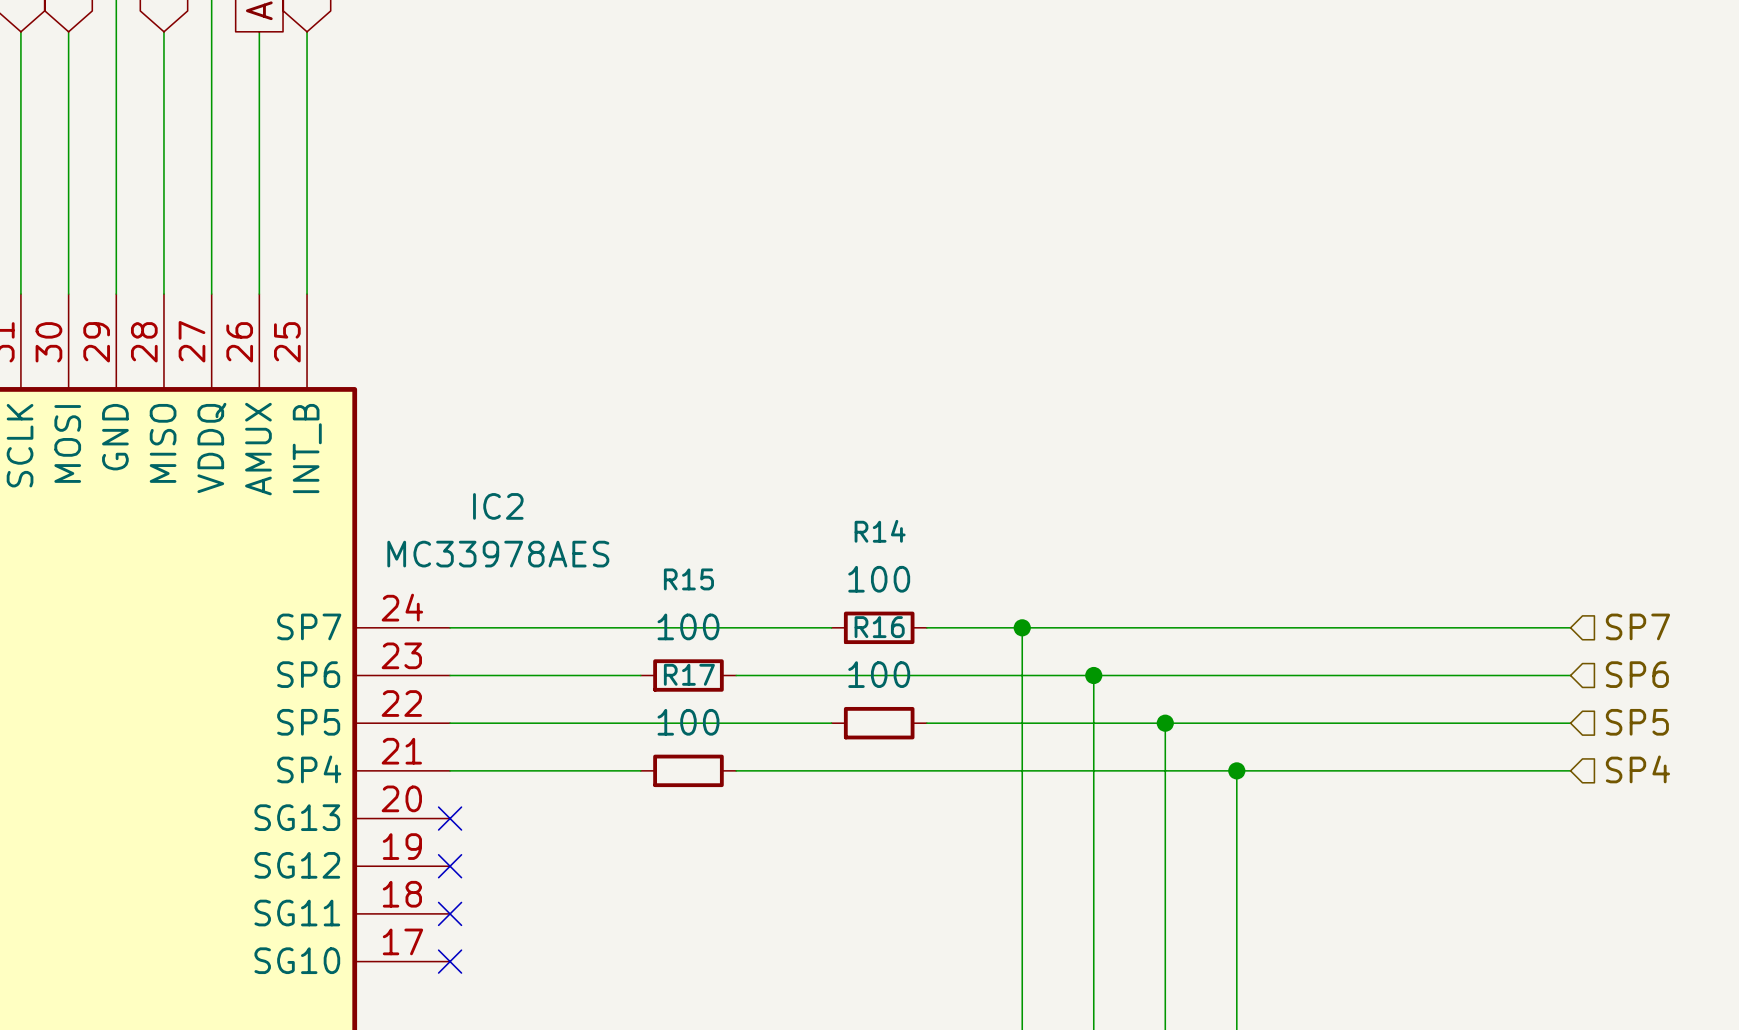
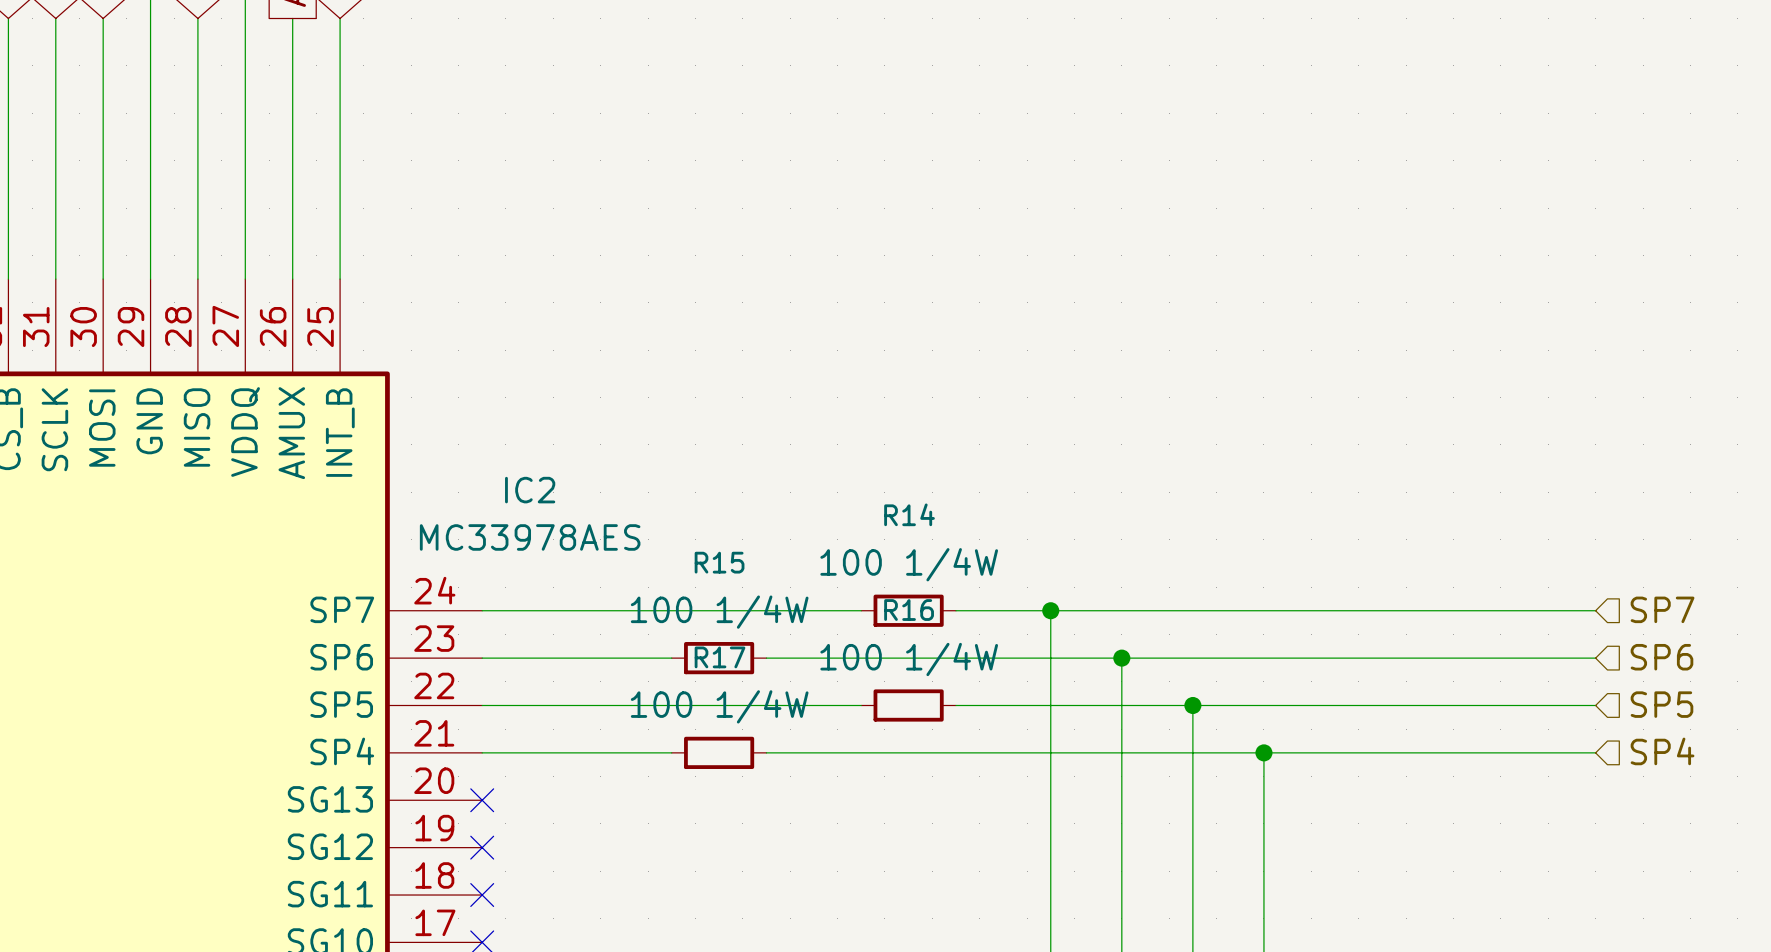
R14 value: 100 (879, 579) -> 100 1/4W (909, 564)
R15 value: 100 (688, 626) -> 100 1/4W (719, 612)
R16 value: 100 (879, 674) -> 100 1/4W (909, 659)
R17 value: 100 (688, 722) -> 100 1/4W (719, 706)

